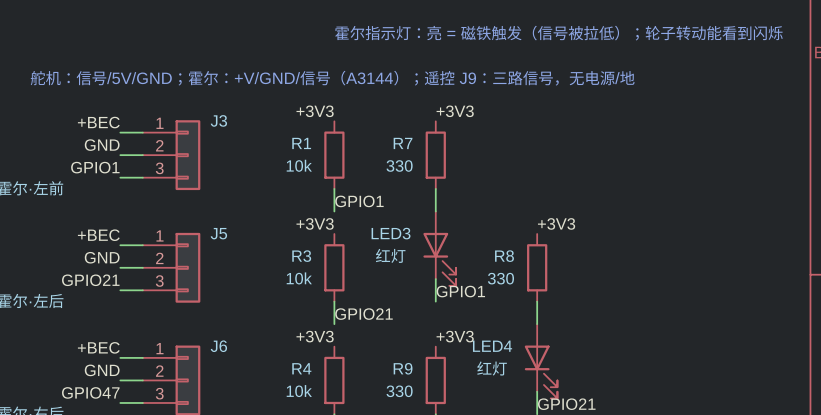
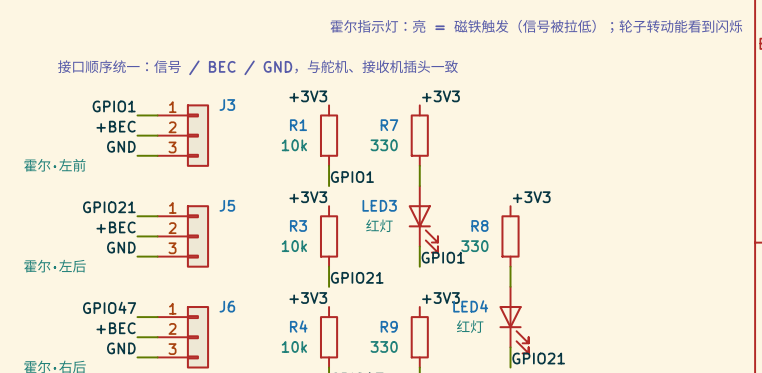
text: 舵机：信号/5V/GND；霍尔：+V/GND/信号（A3144）；遥控 J9：三路信号，无电源/地 (332, 78) -> 接口顺序统一：信号 / BEC / GND，与舵机、接收机插头一致 (257, 67)
label: +BEC (98, 122) -> GPIO1 (114, 106)
label: GND (102, 145) -> +BEC (116, 126)
label: GPIO1 (95, 167) -> GND (121, 146)
label: +BEC (98, 235) -> GPIO21 (109, 207)
label: GND (102, 257) -> +BEC (116, 227)
label: GPIO21 (90, 280) -> GND (121, 247)
label: +BEC (98, 347) -> GPIO47 (109, 307)
label: GND (102, 370) -> +BEC (116, 328)
label: GPIO47 (90, 392) -> GND (121, 348)

